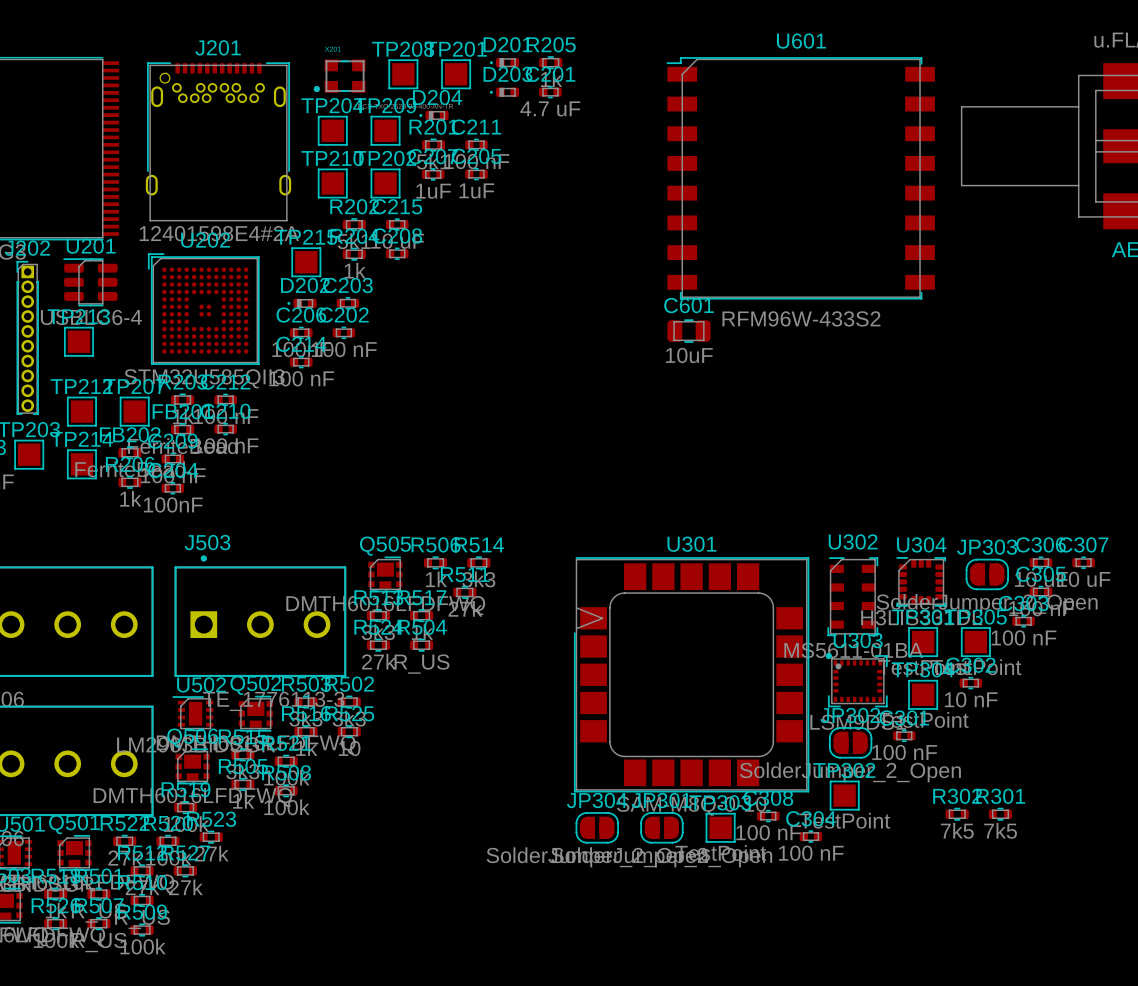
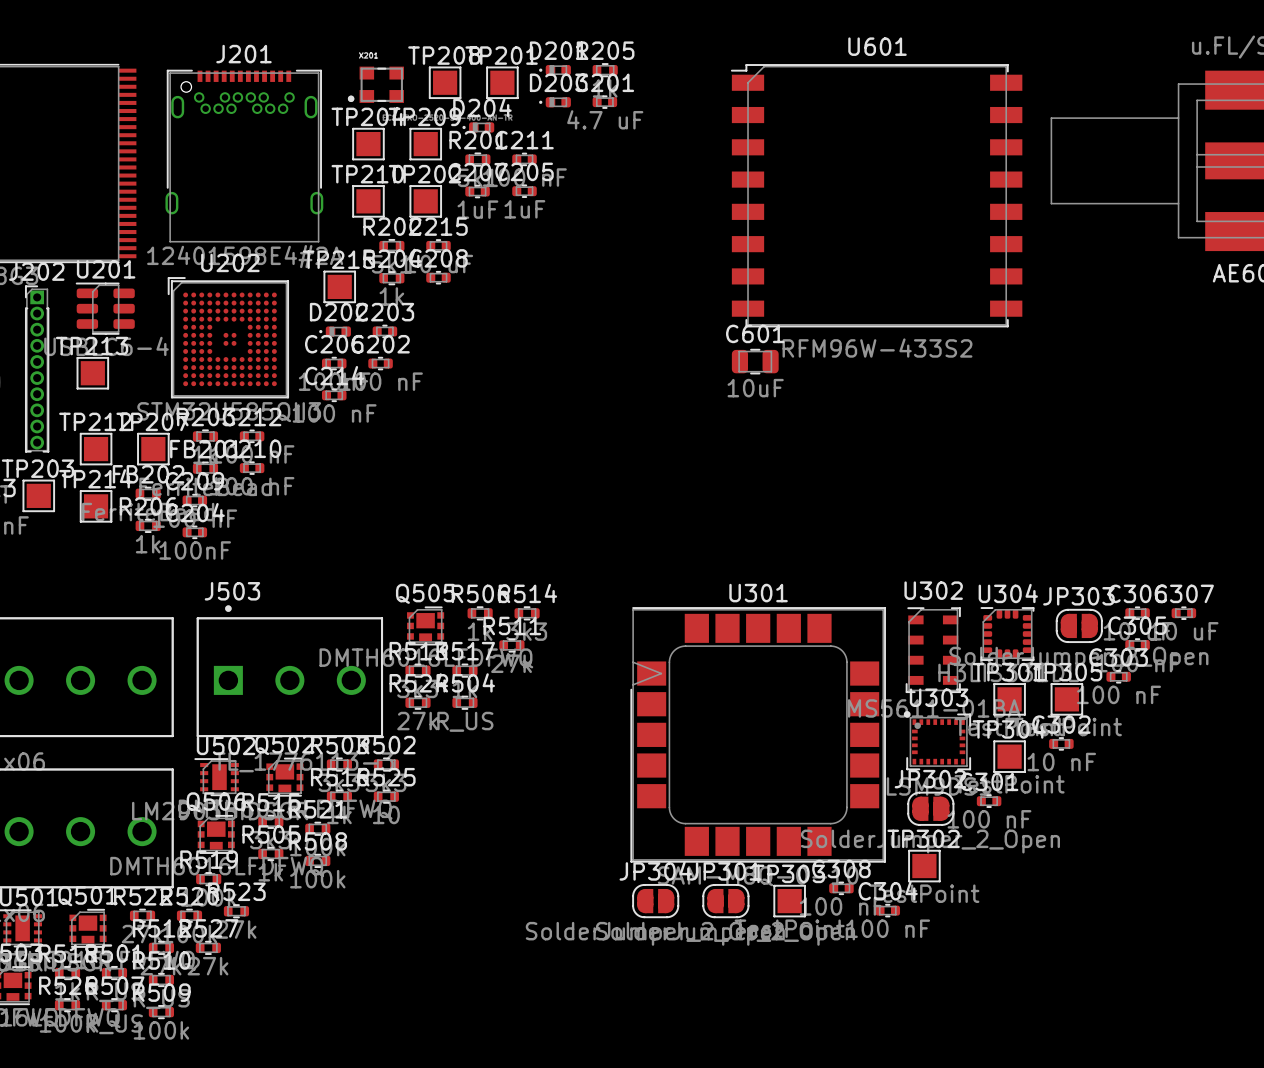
R302: 7k5 (957, 814) -> none
R301: 7k5 (1000, 814) -> none

